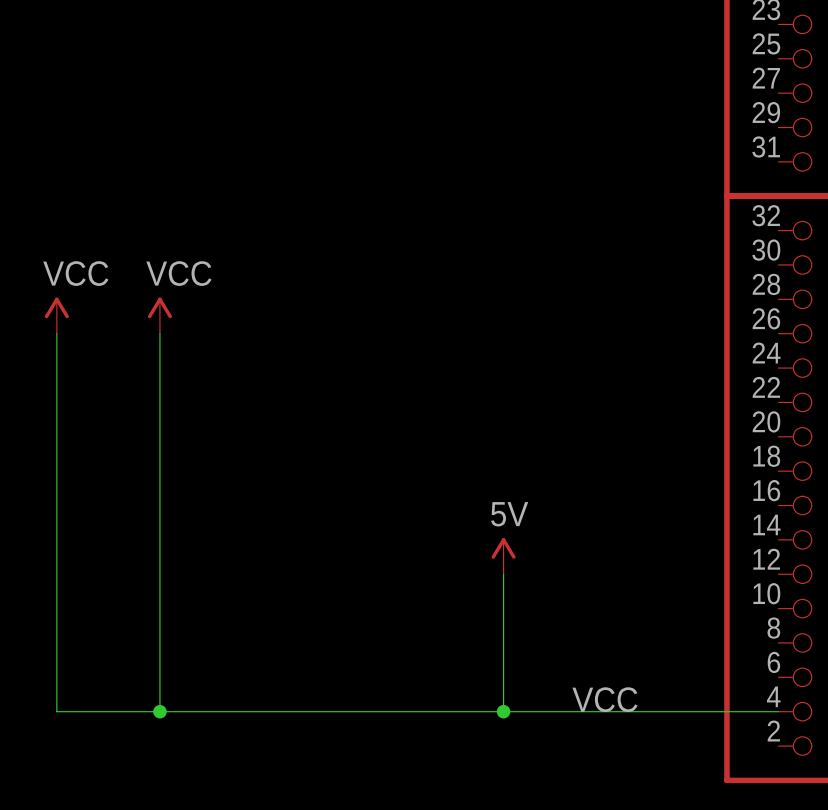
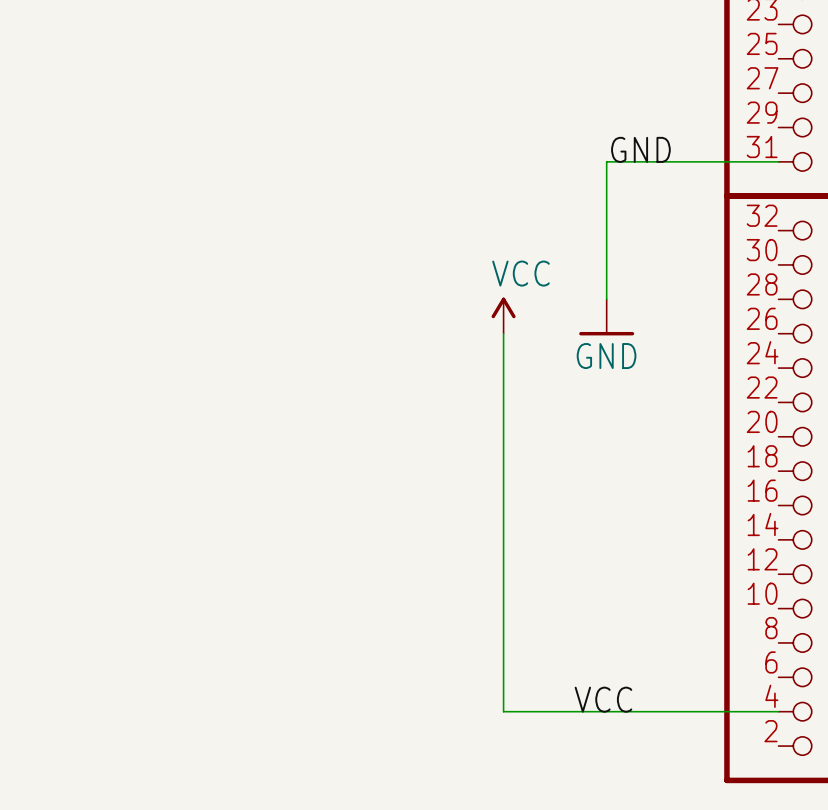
label: none -> GND (640, 149)
wire: none -> (778, 161) (606, 161) (606, 299)
power symbol: VCC (56, 315) -> none
power symbol: VCC (159, 315) -> none
power symbol: none -> VCC (503, 315)
power symbol: none -> GND (606, 317)
wire: (56, 333) (56, 711) (503, 711) -> none
wire: (159, 333) (159, 711) -> none
wire: none -> (503, 333) (503, 574)
power symbol: 5V (503, 556) -> none
junction: (159, 711) -> none
junction: (503, 711) -> none

